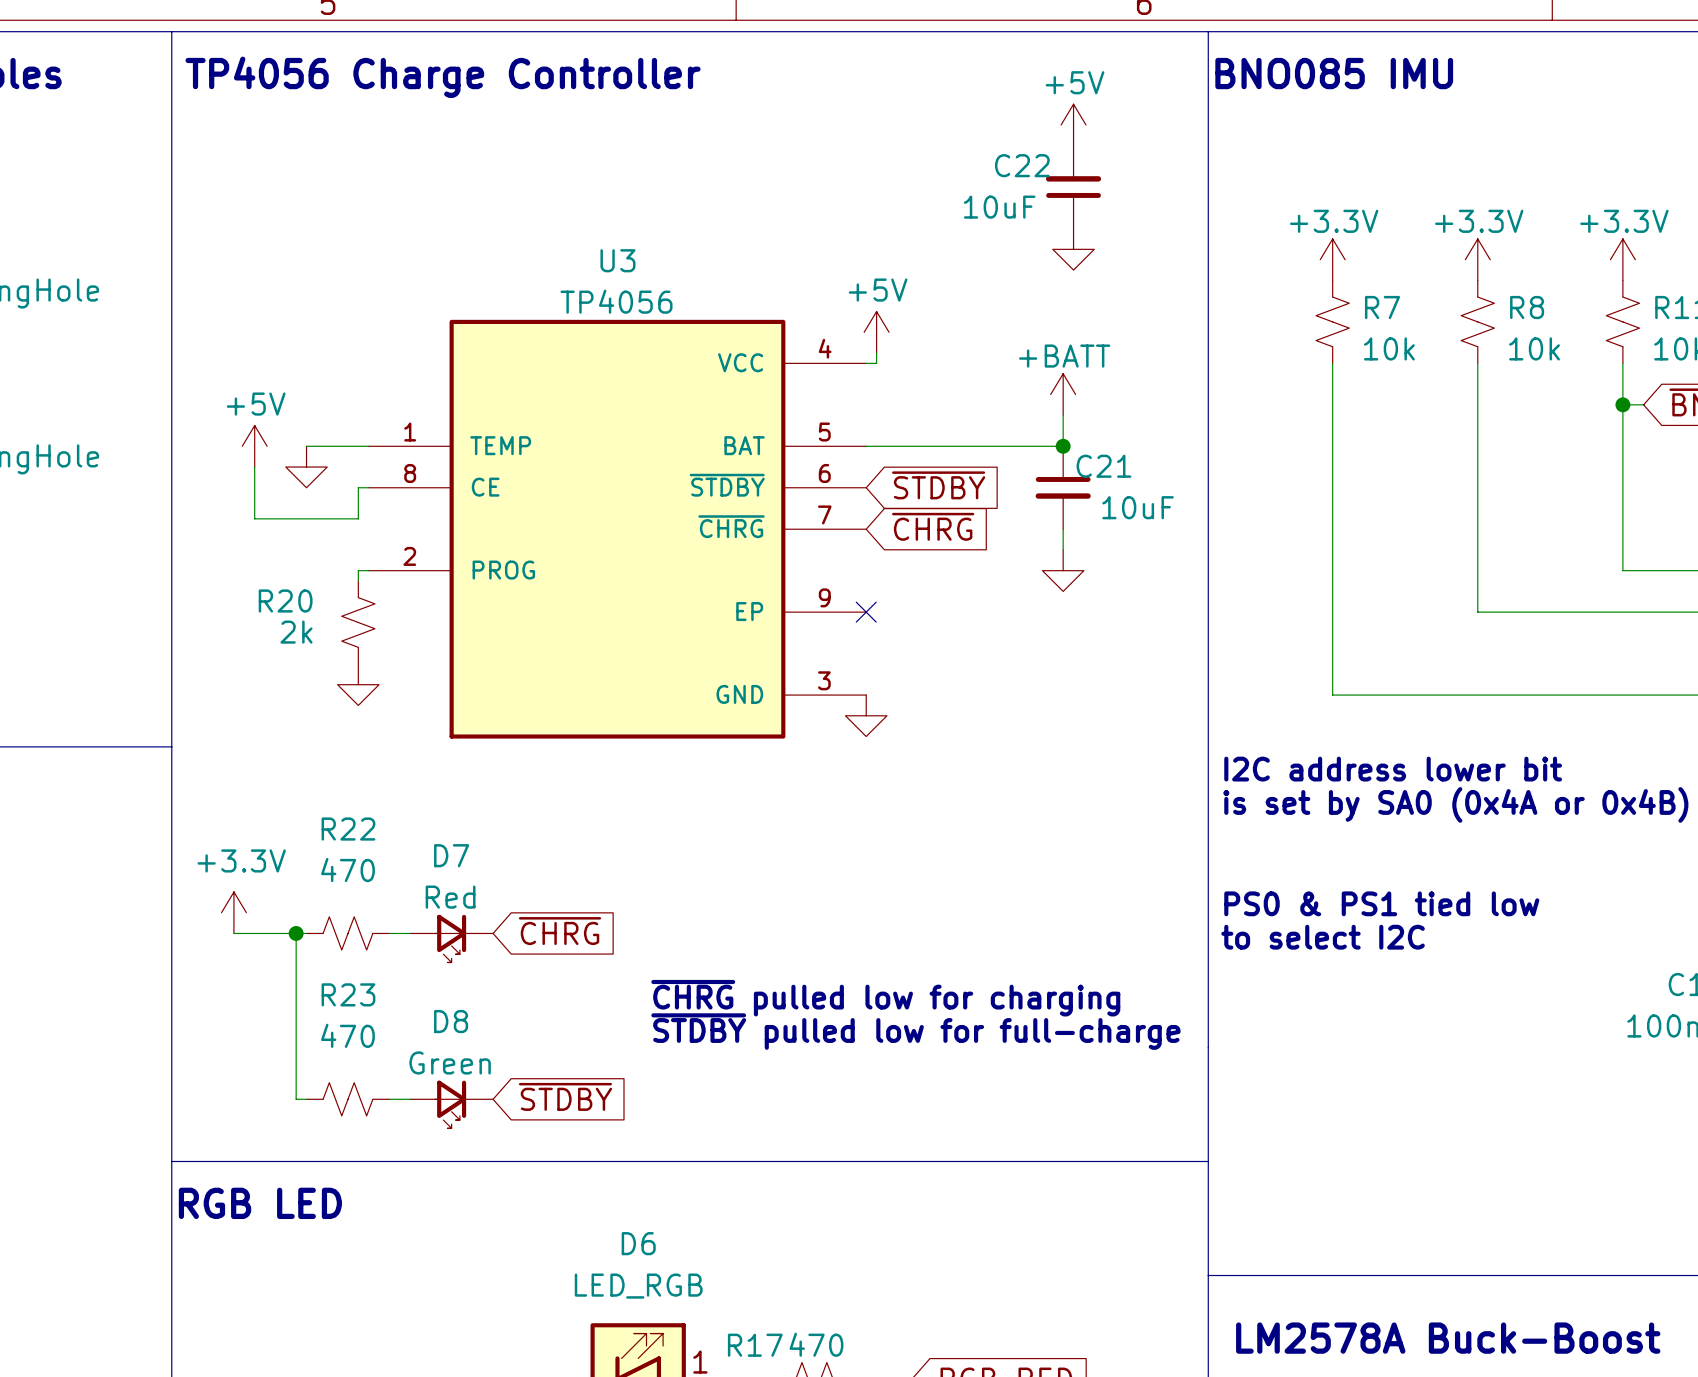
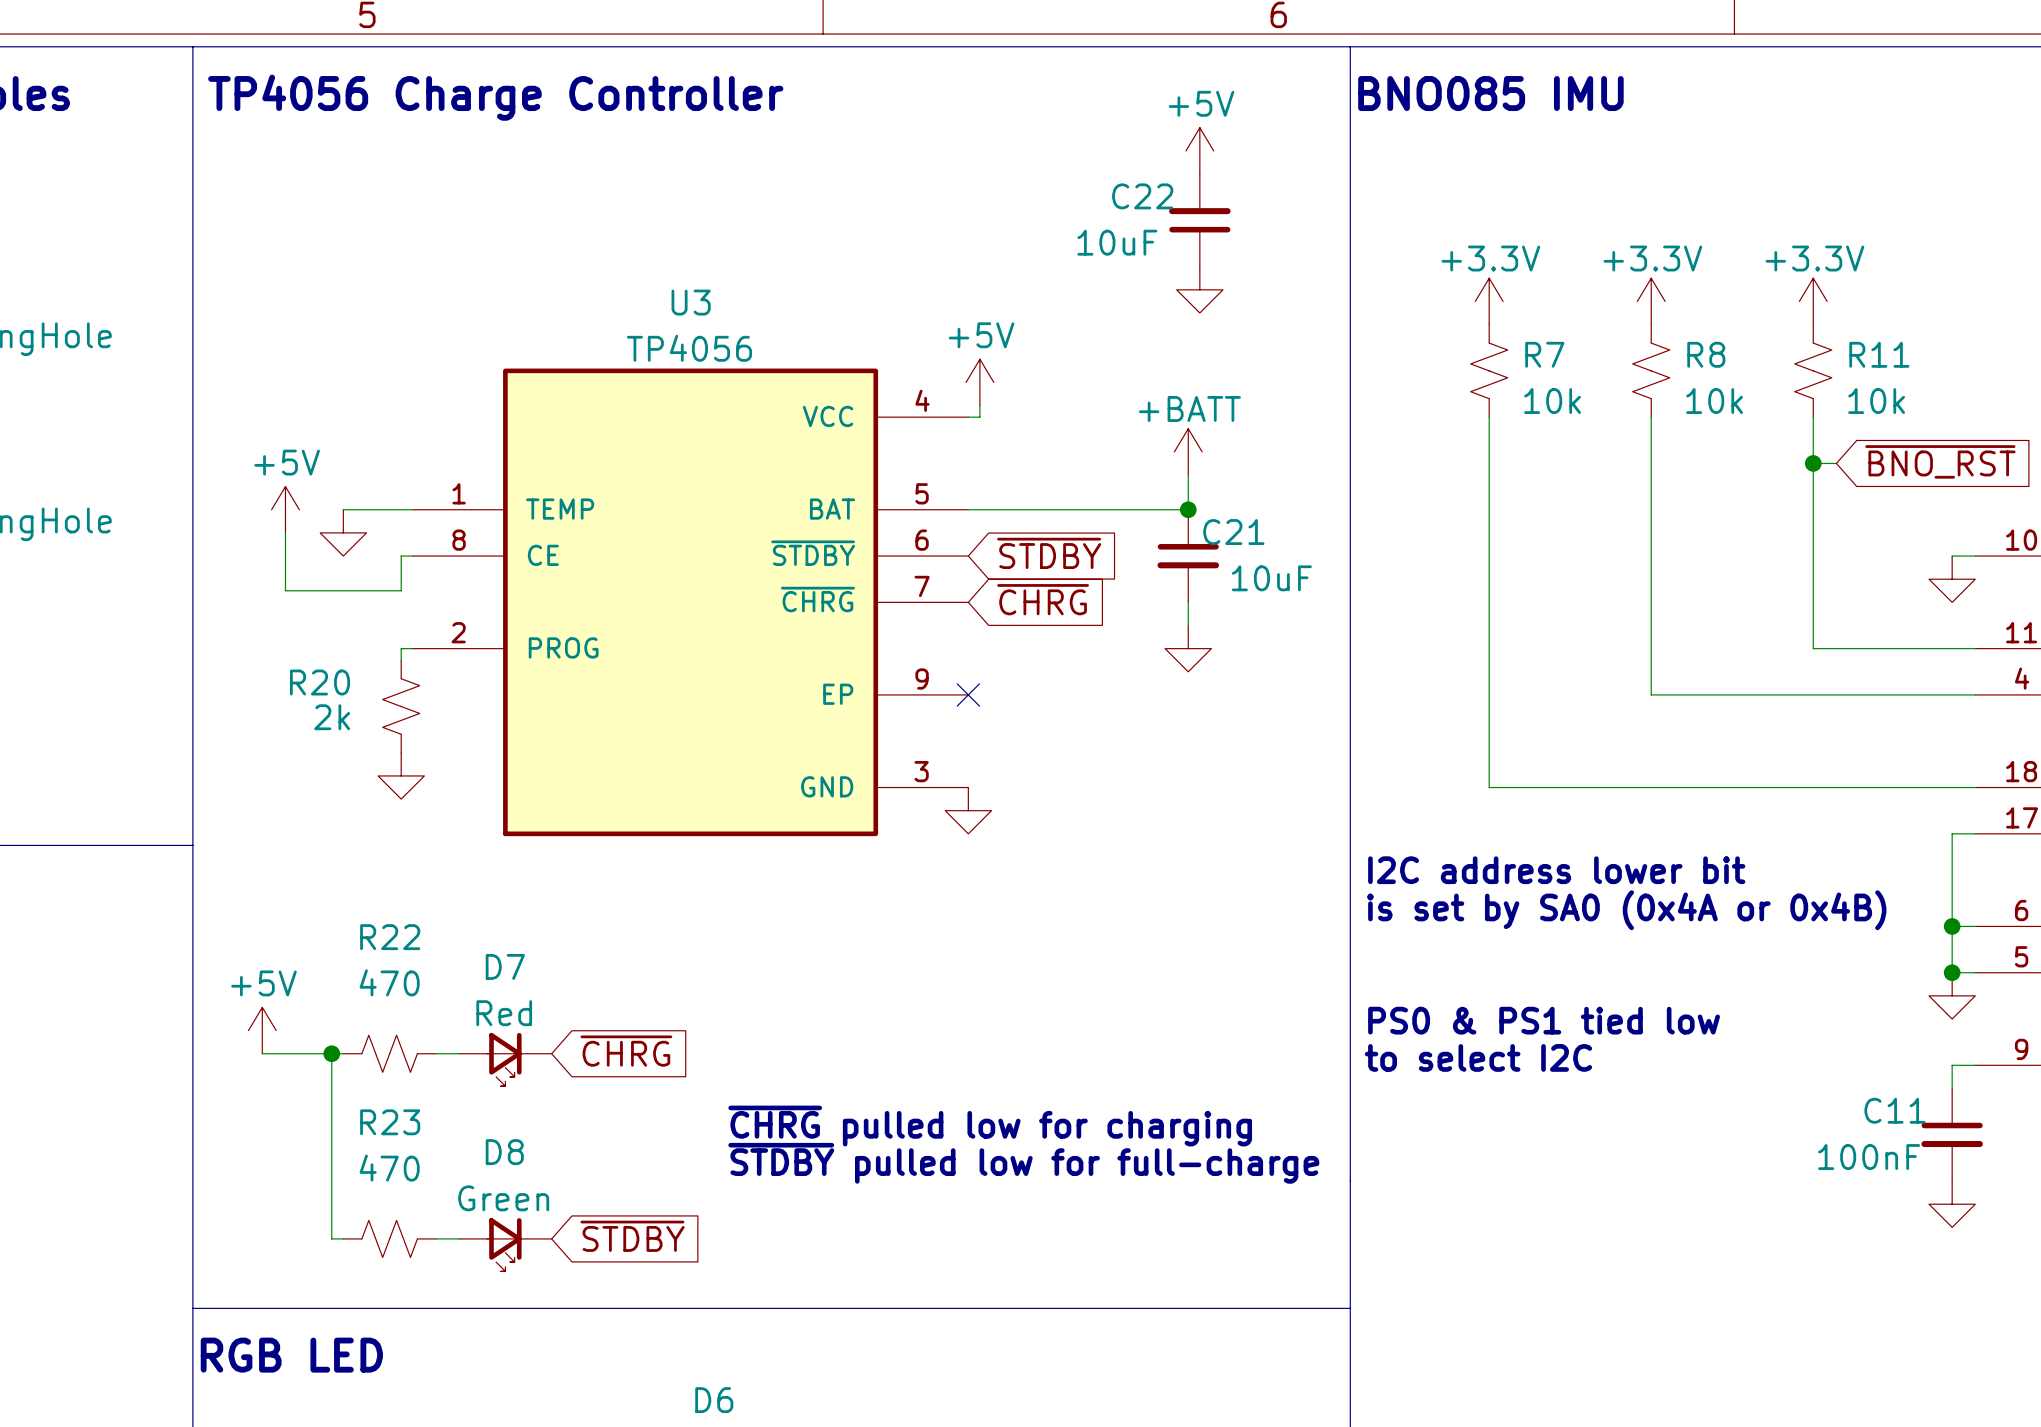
power symbol: +3.3V (233, 912) -> +5V (262, 1030)

